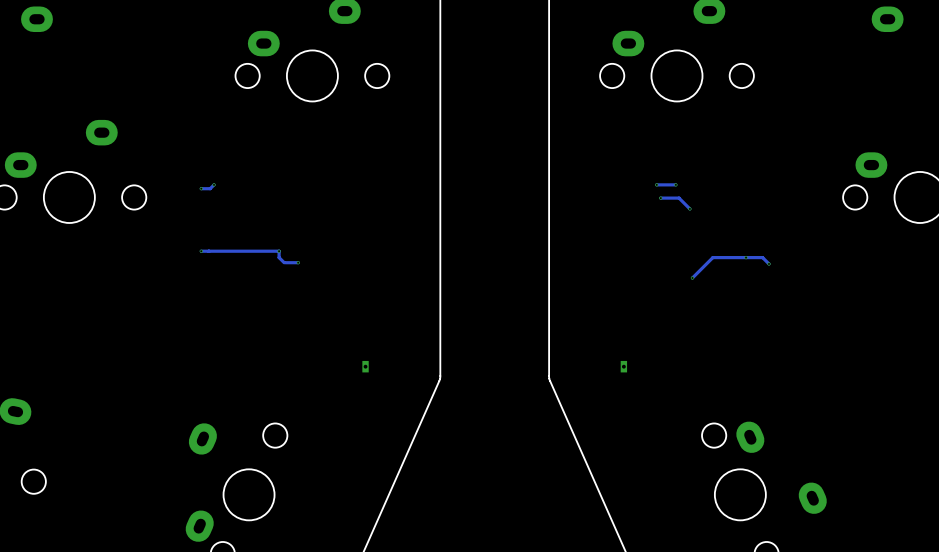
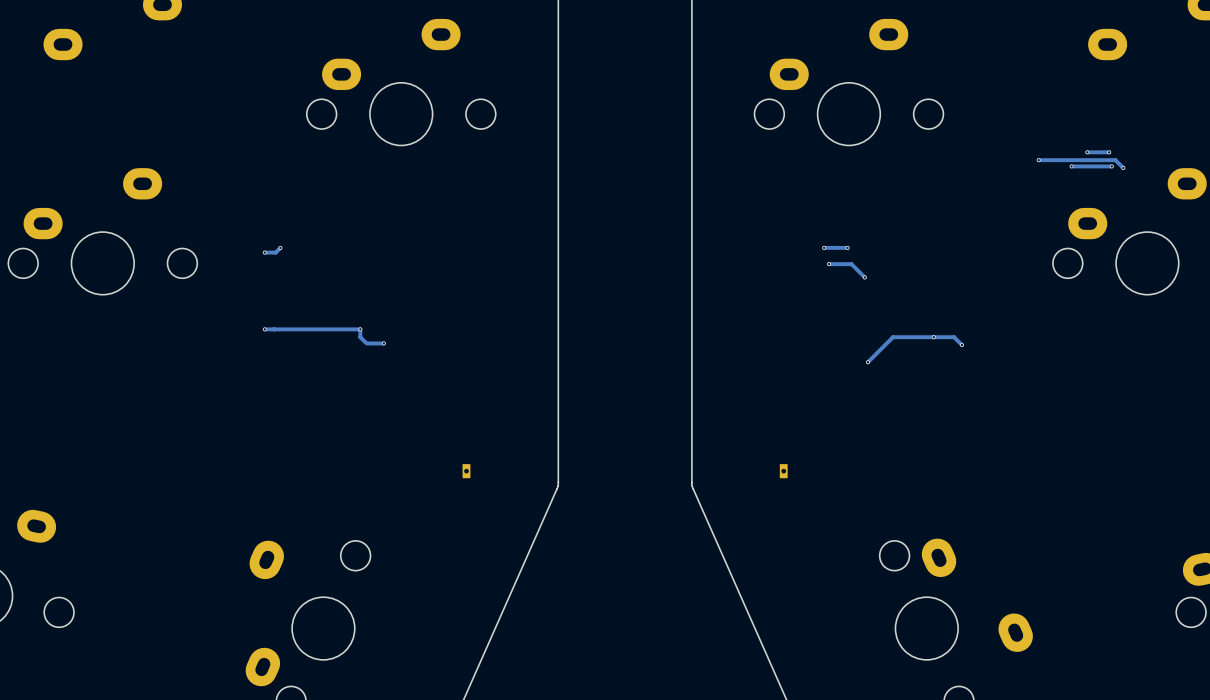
via: none -> (1087, 152)
track: none -> (1109, 152) (1087, 152)
via: none -> (1109, 152)
track: none -> (1038, 160) (1115, 160) (1123, 168)
via: none -> (1038, 160)
via: none -> (1071, 166)
track: none -> (1111, 166) (1071, 166)
via: none -> (1111, 166)
via: none -> (1123, 168)

